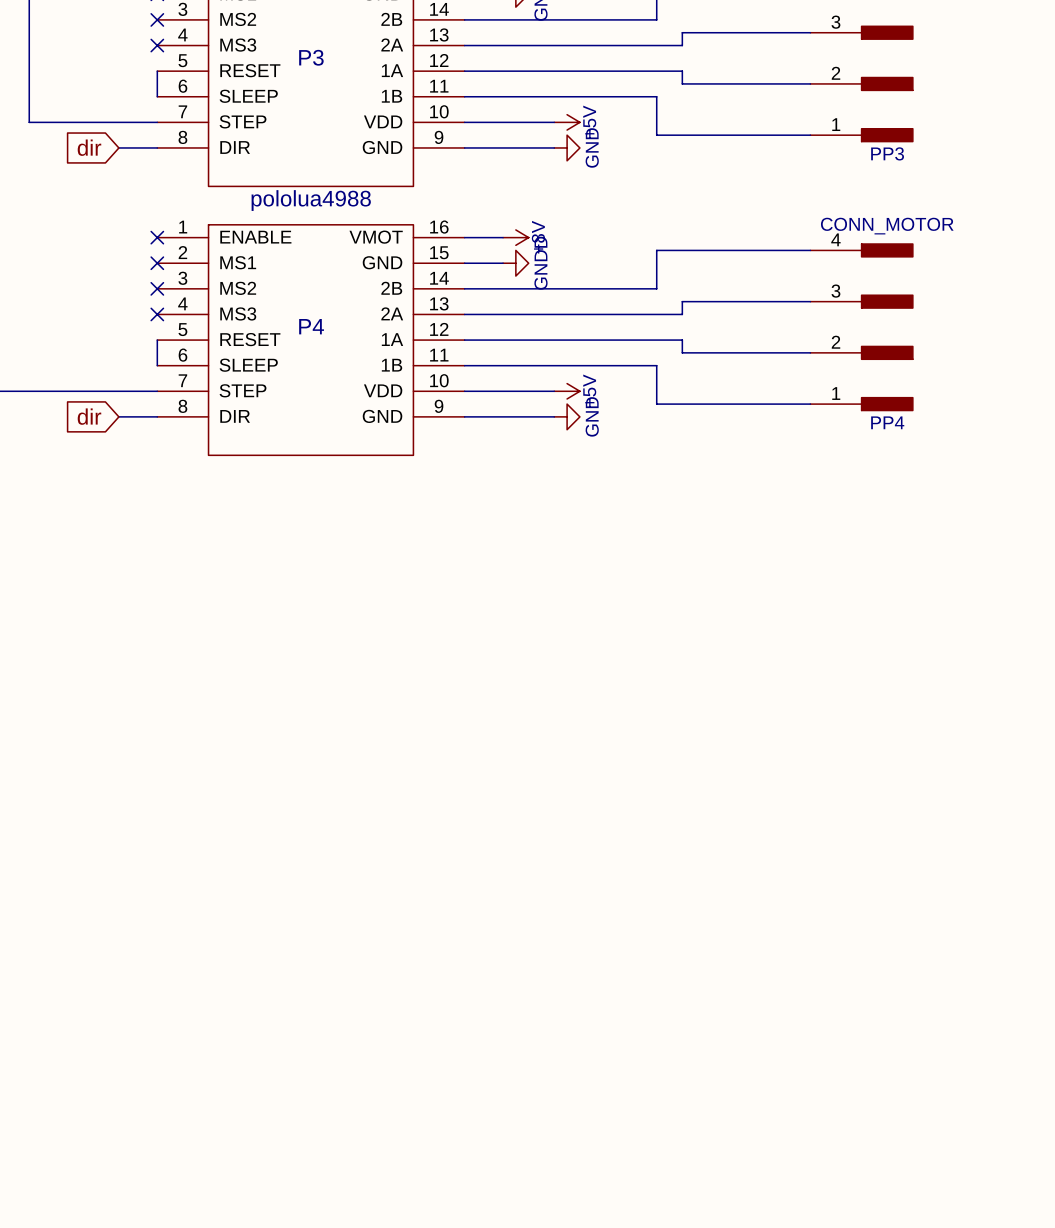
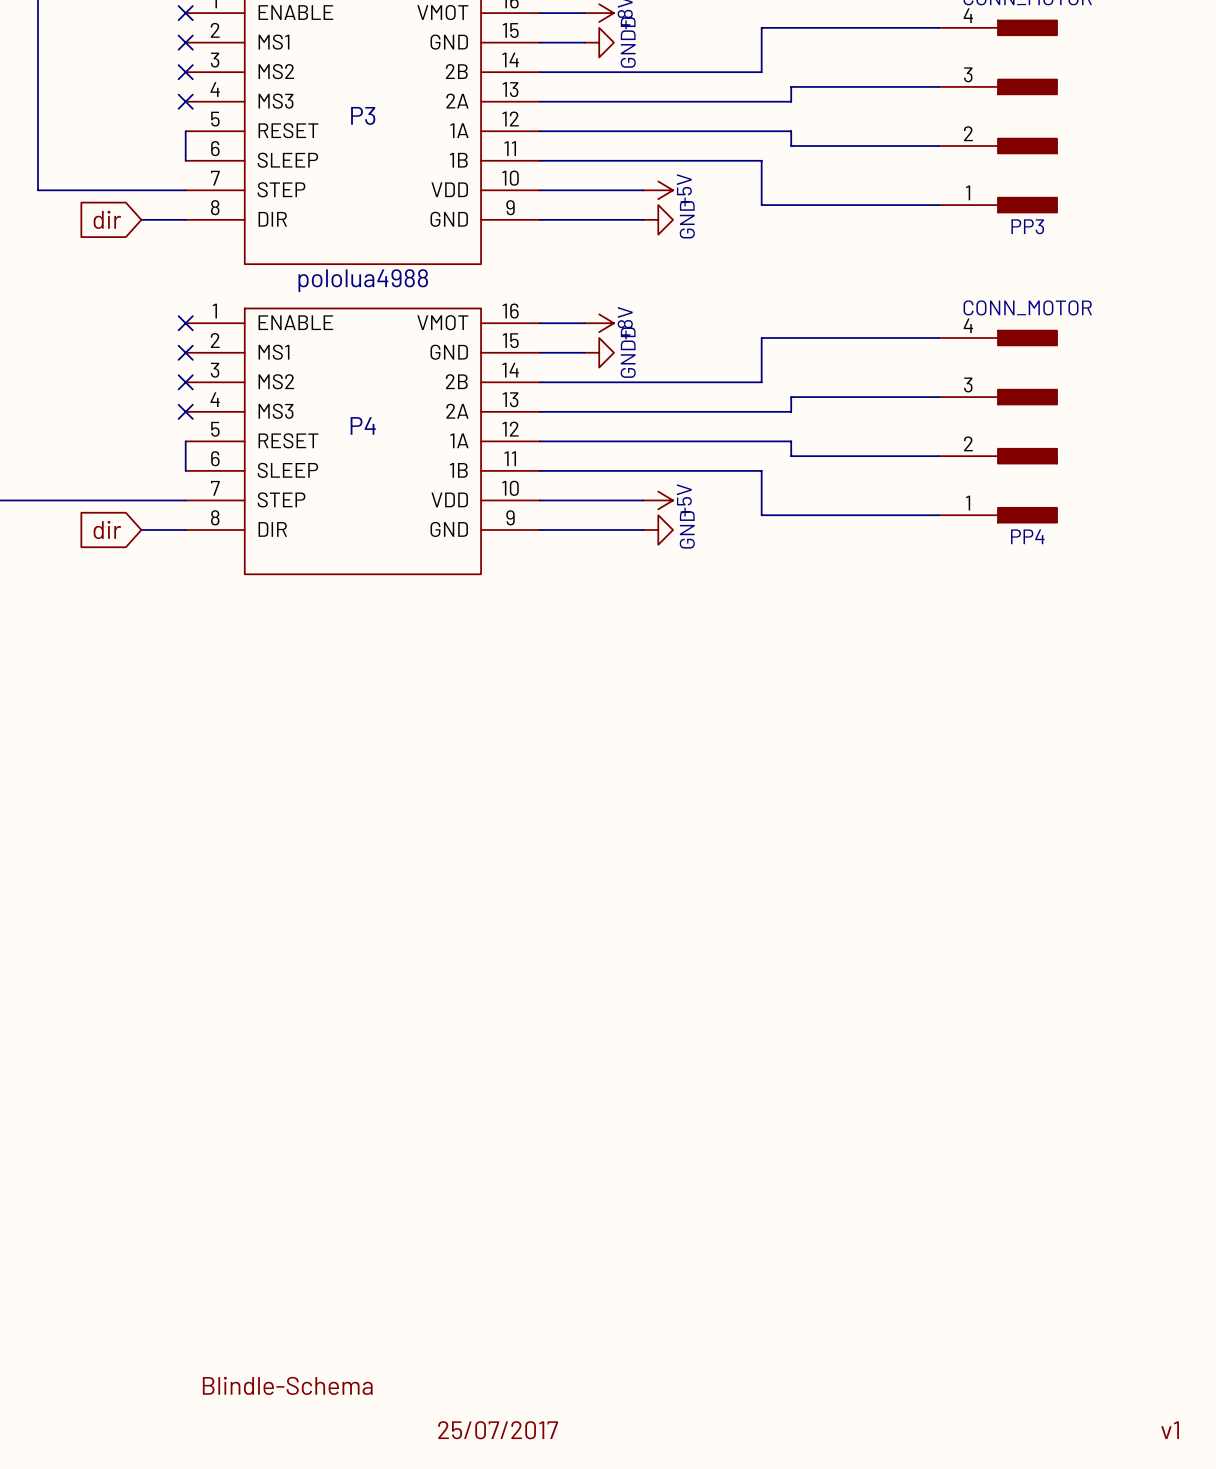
label: none -> Blindle-Schema (287, 1385)
label: none -> 25/07/2017 (498, 1430)
label: none -> v1 (1170, 1430)

